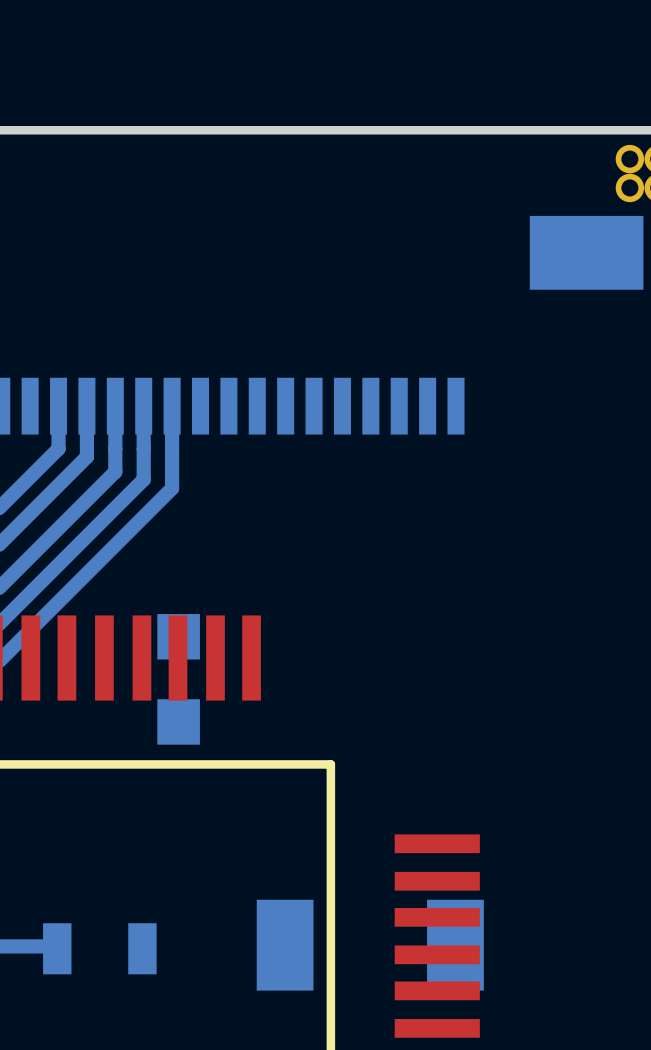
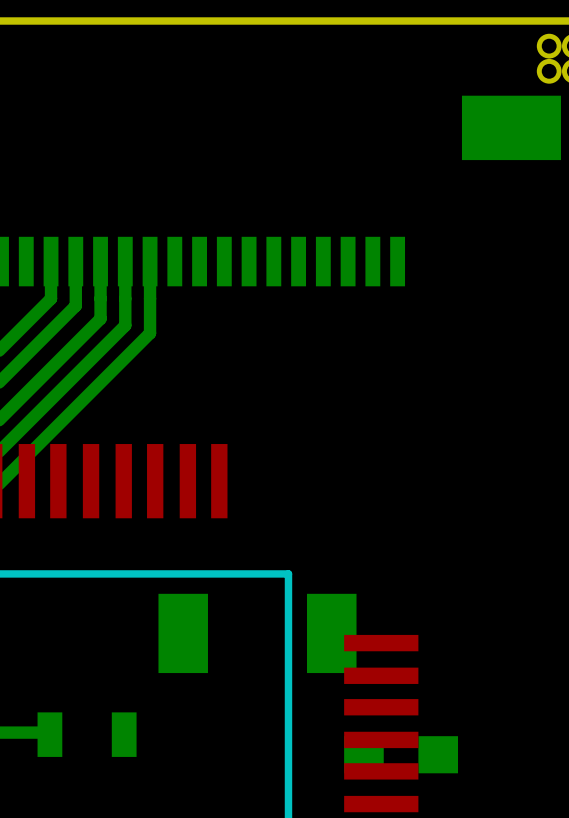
part rotation: 0° (178, 679) -> 90° clockwise (401, 754)
part position: (178, 679) -> (401, 754)
part position: (370, 945) -> (257, 633)

